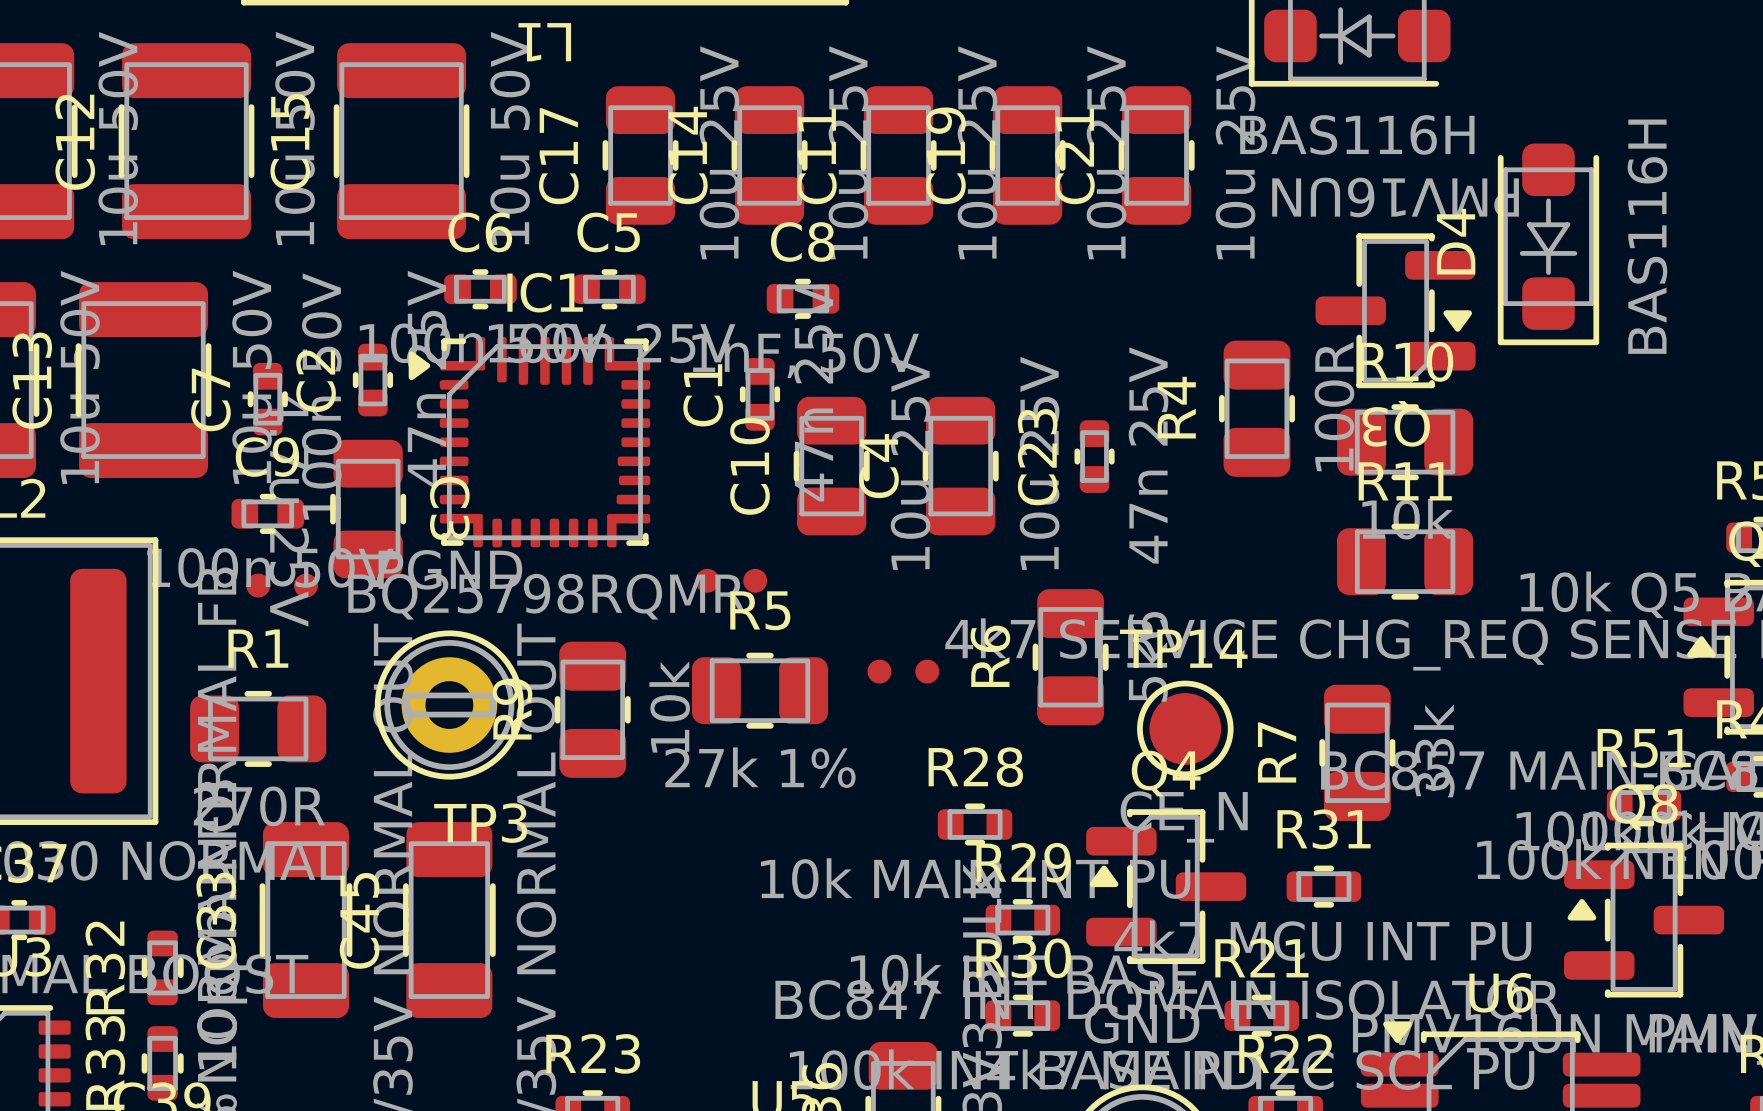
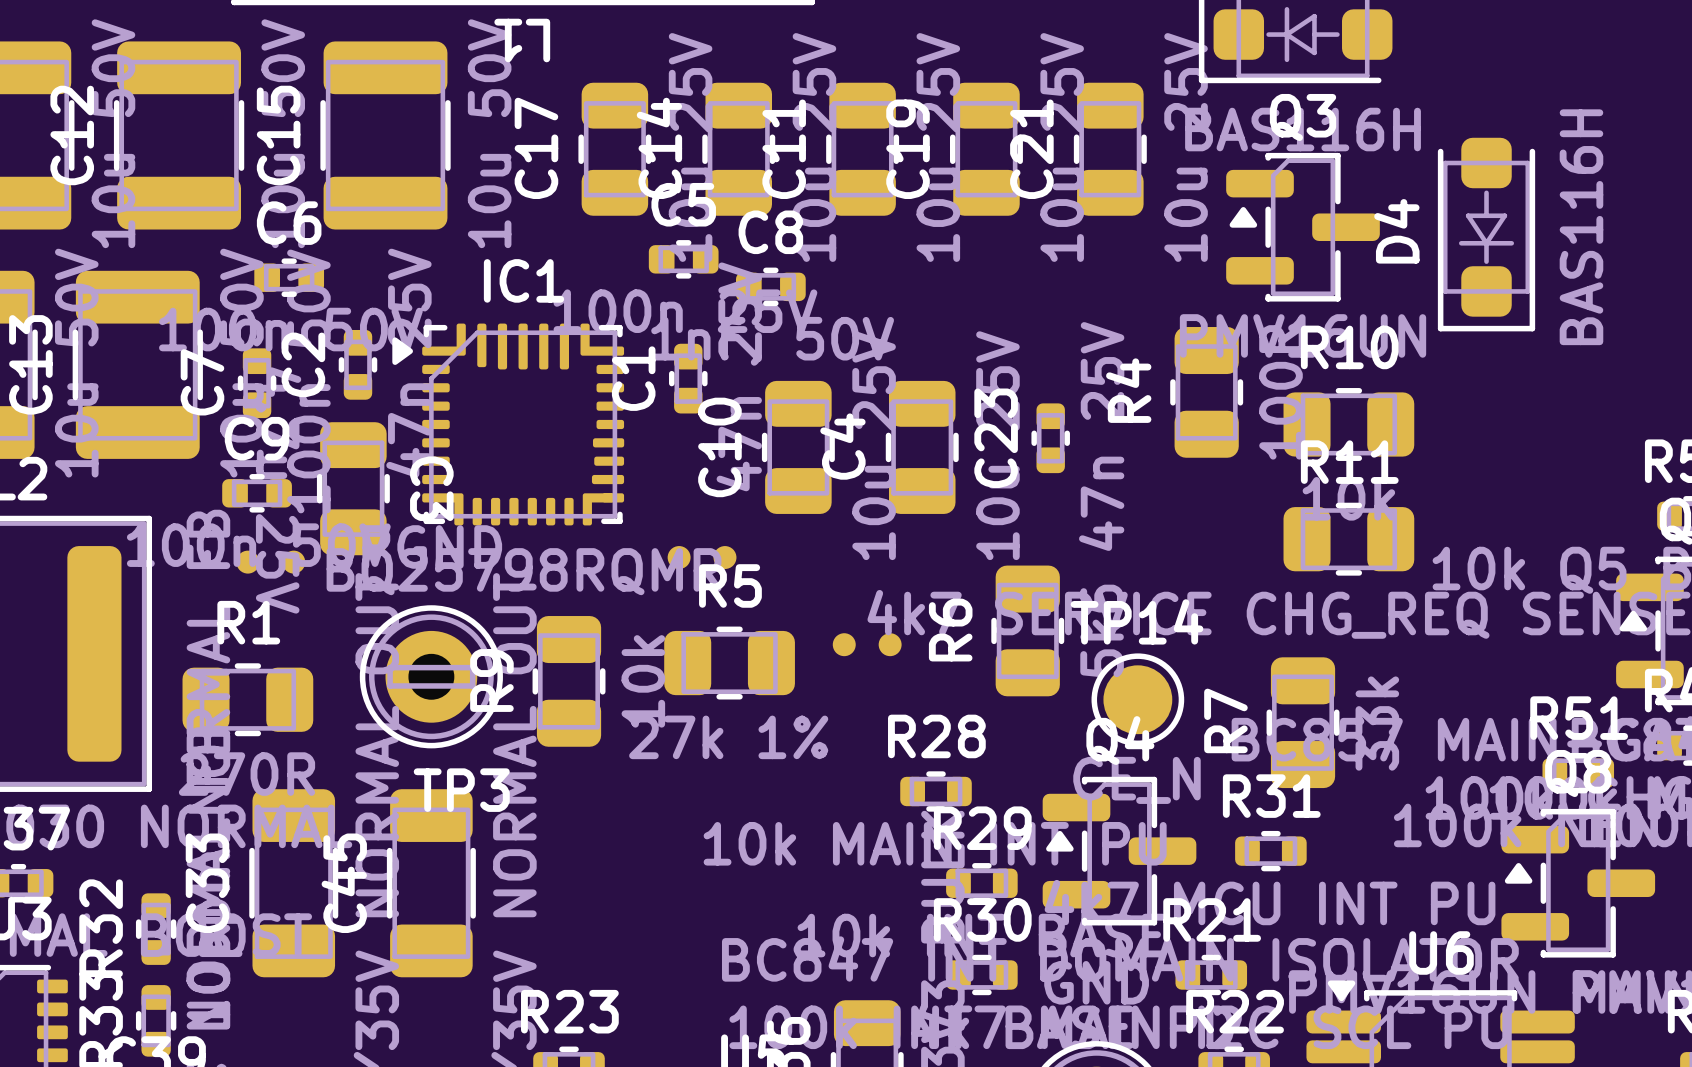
C6 position: (480, 289) -> (289, 277)
C5 position: (609, 289) -> (683, 259)
Q3 rotation: 0° (1395, 310) -> 180° (1303, 227)
C1 position: (759, 394) -> (688, 378)

